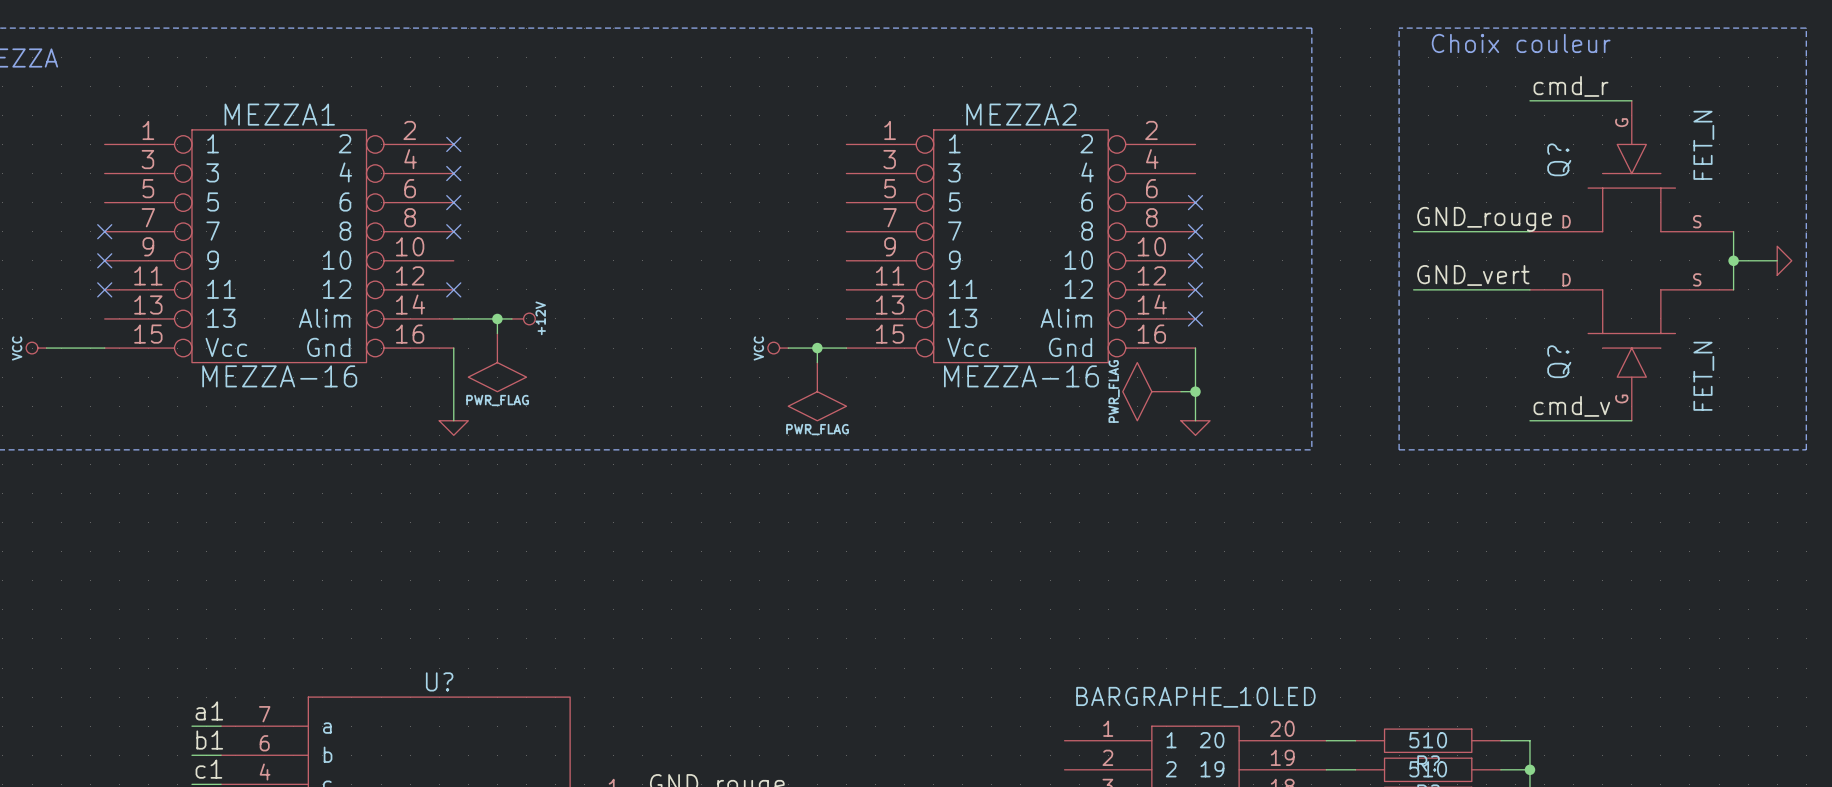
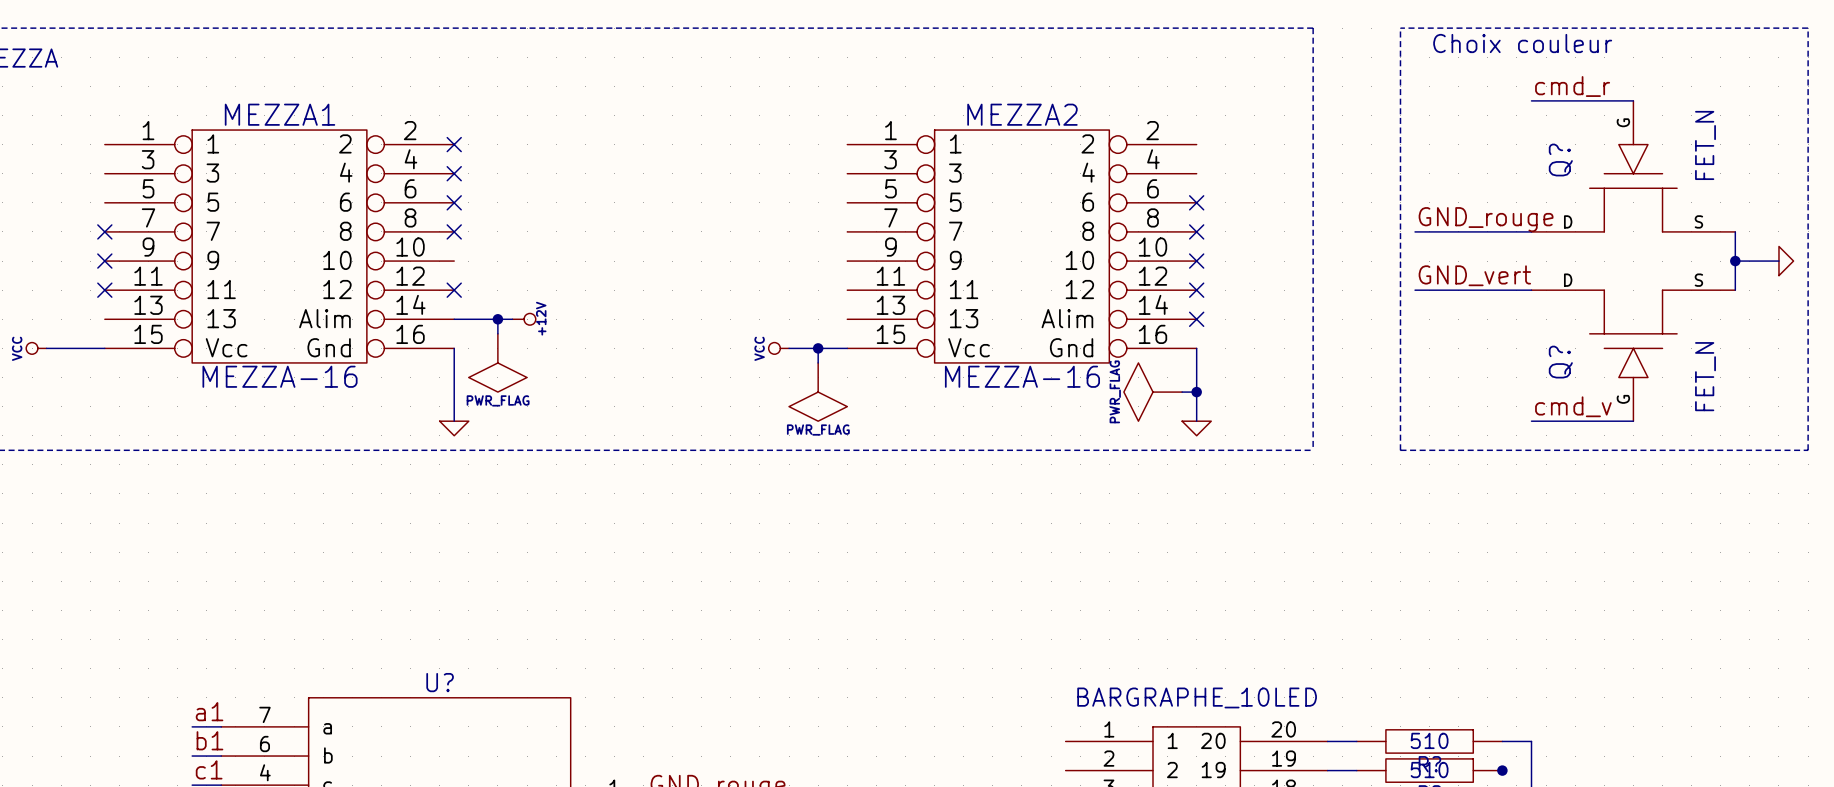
wire: (1500, 769) (1529, 769) -> none
junction: none -> (1502, 770)
junction: (1529, 769) -> none

